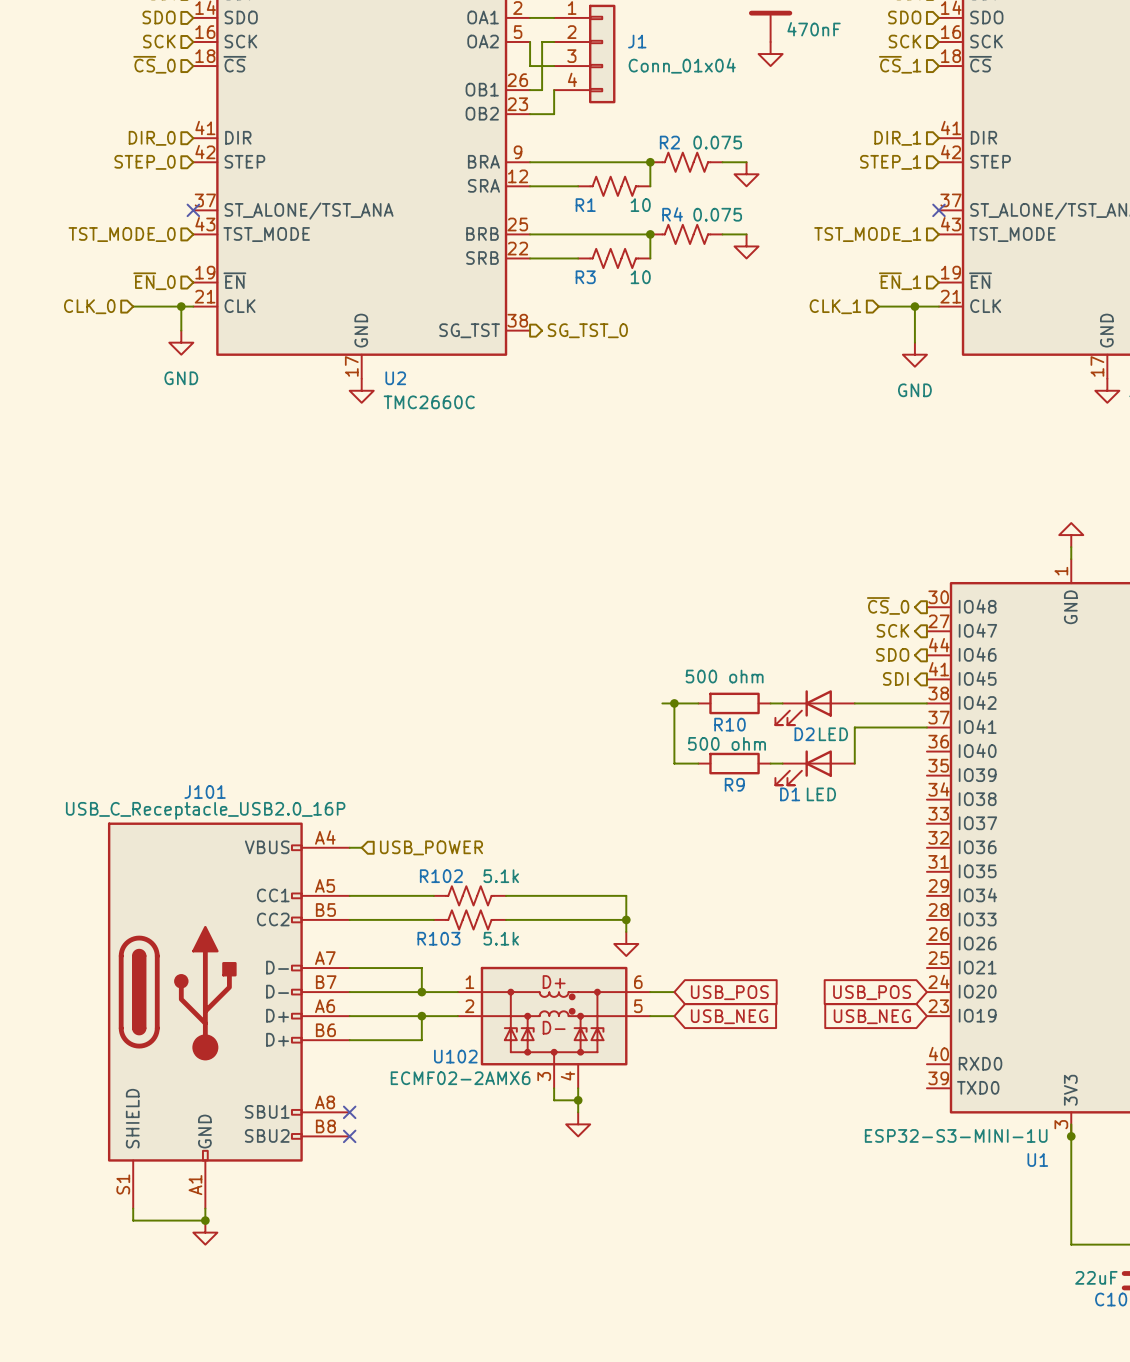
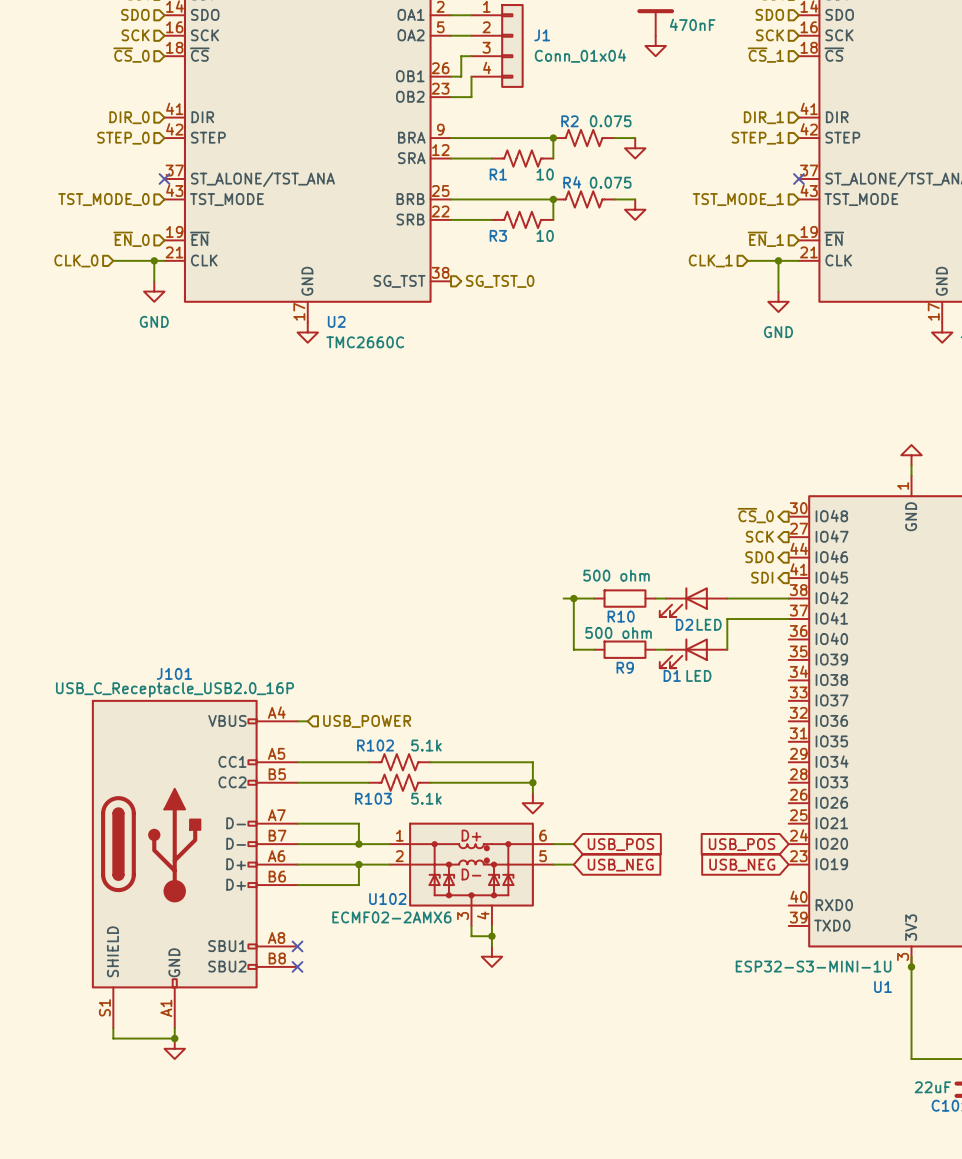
wire: (530, 41) (530, 66) (542, 66) (542, 41) -> (451, 35) (461, 35)

